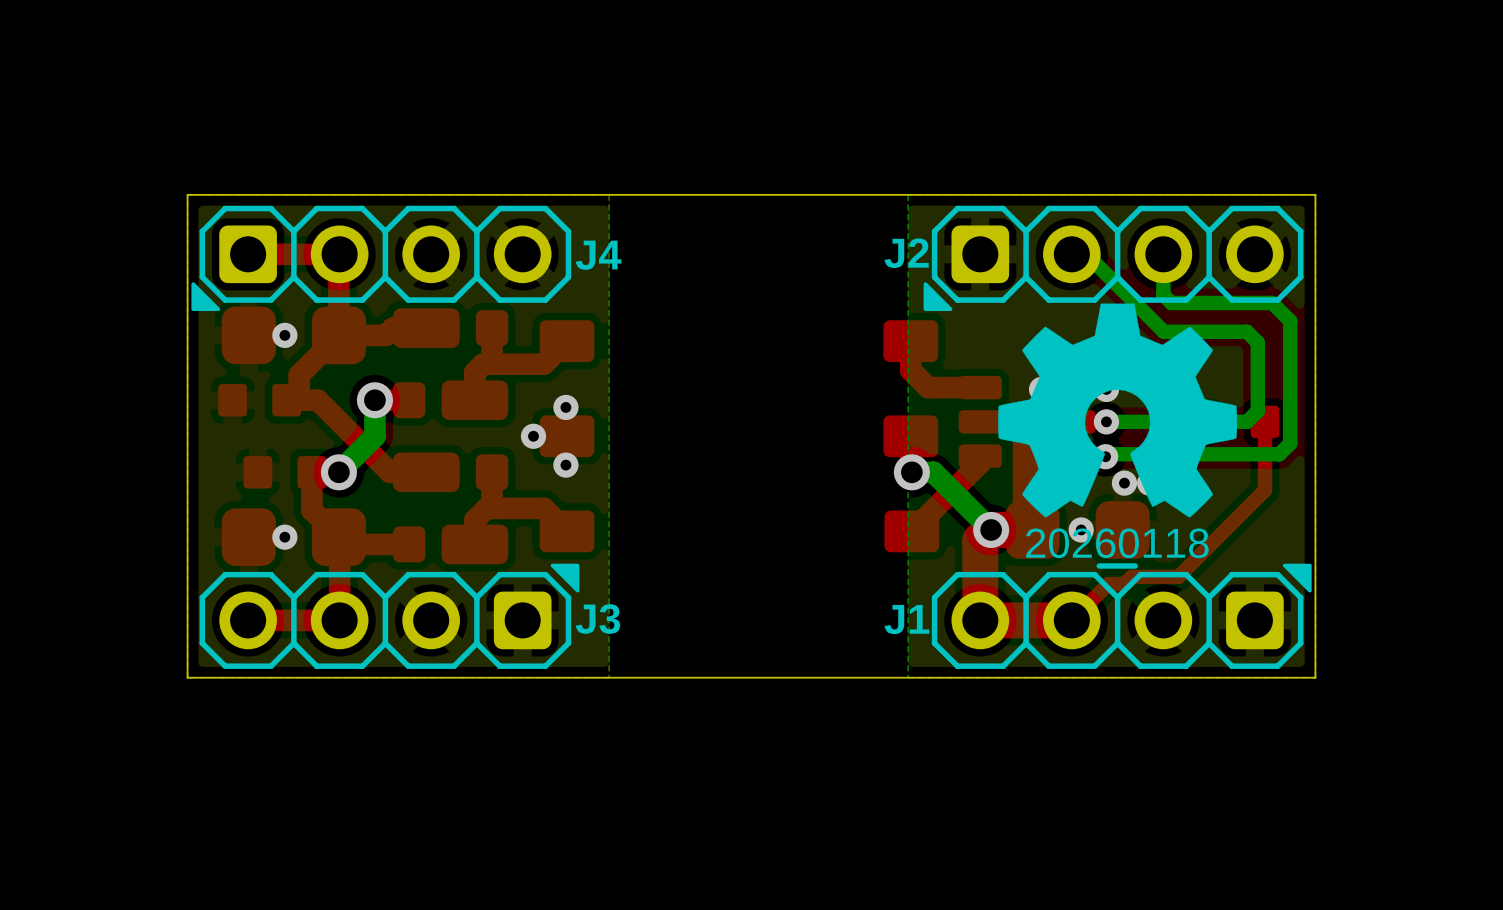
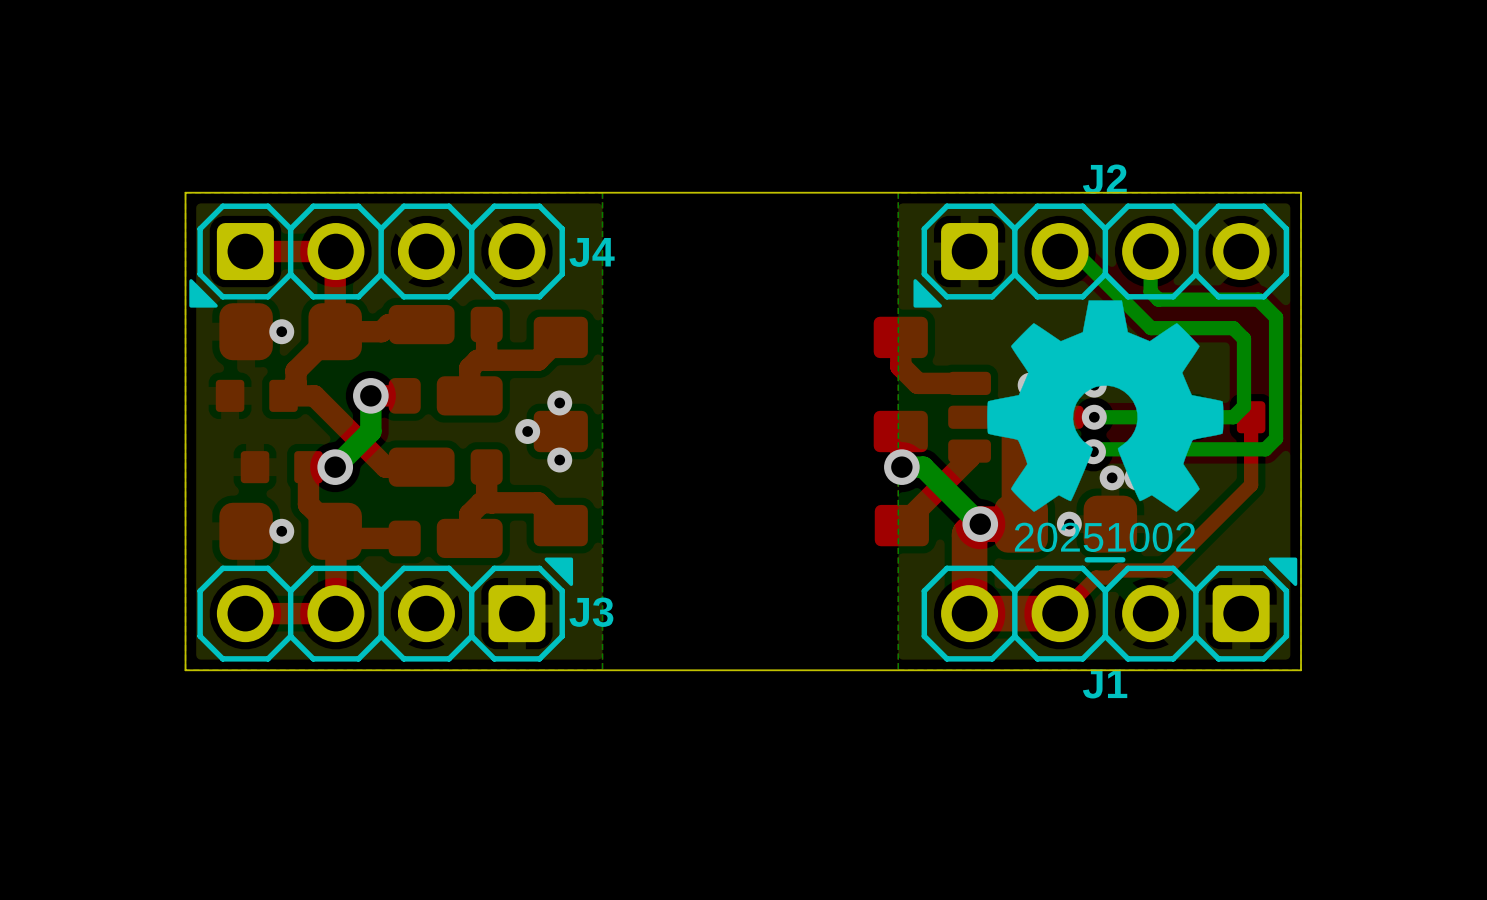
J2 name position: J2 (906, 253) -> J2 (1104, 179)
drawing shape: [1026, 528, 1209, 569] -> [1014, 522, 1196, 563]
J1 name position: J1 (906, 619) -> J1 (1105, 684)

